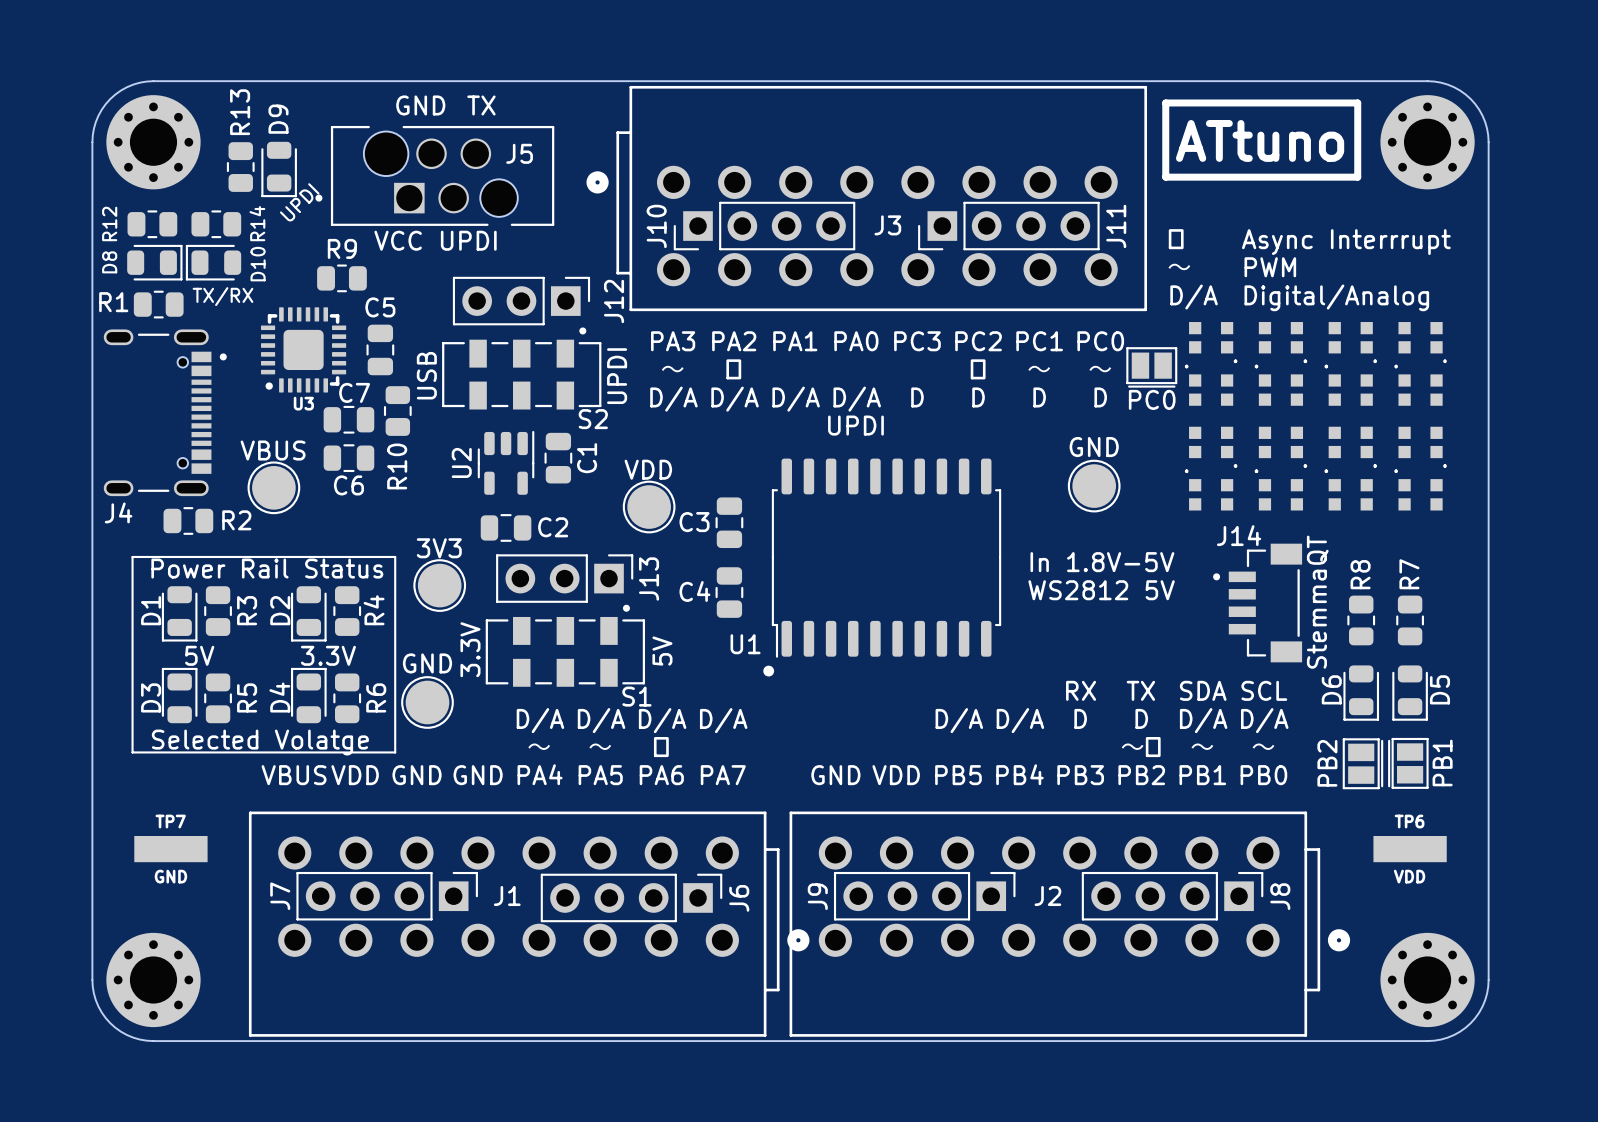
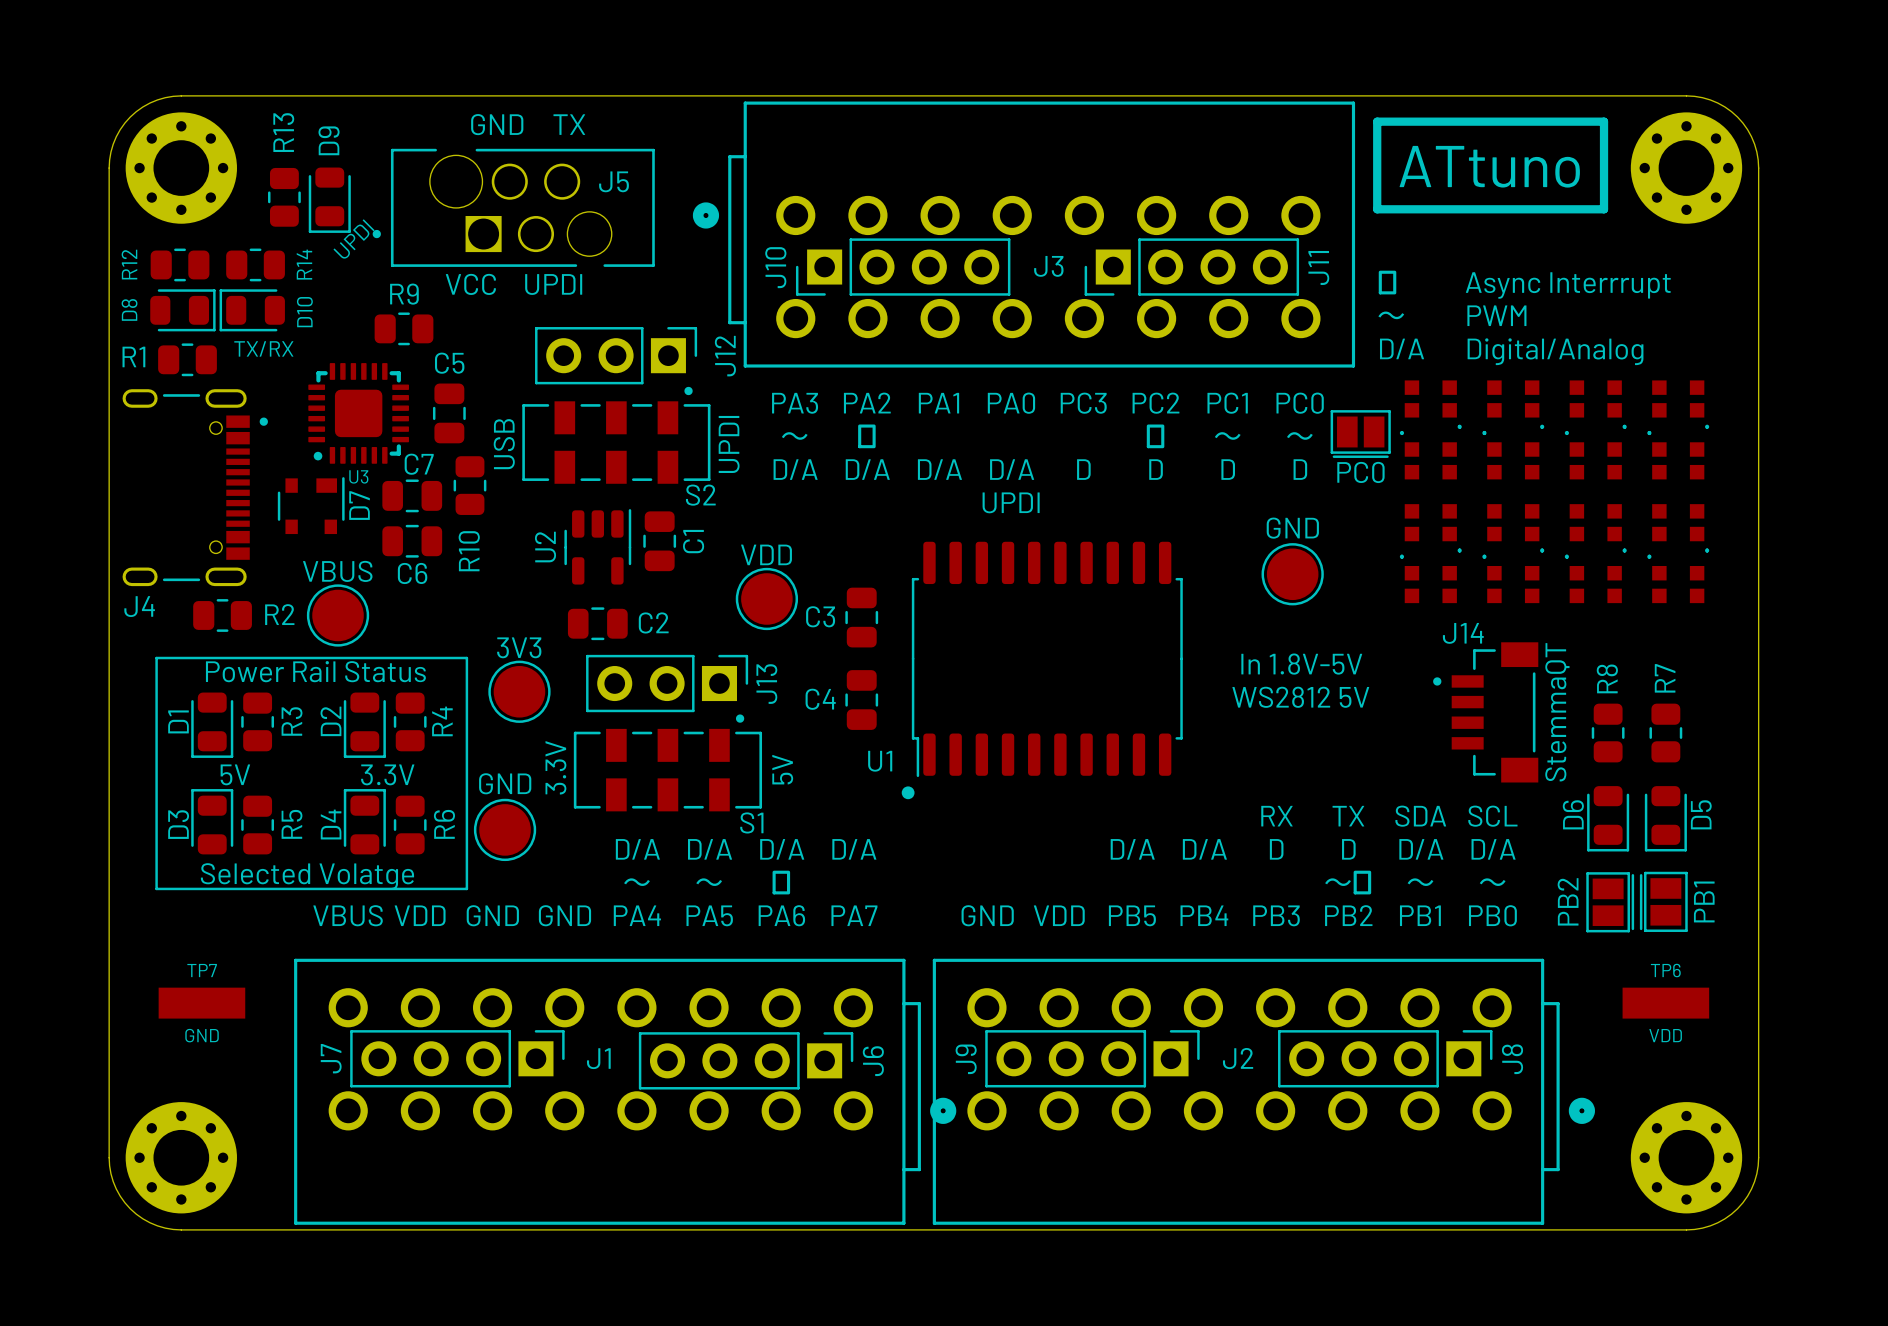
D7: none -> (311, 505)
part position: (273, 487) -> (338, 615)

